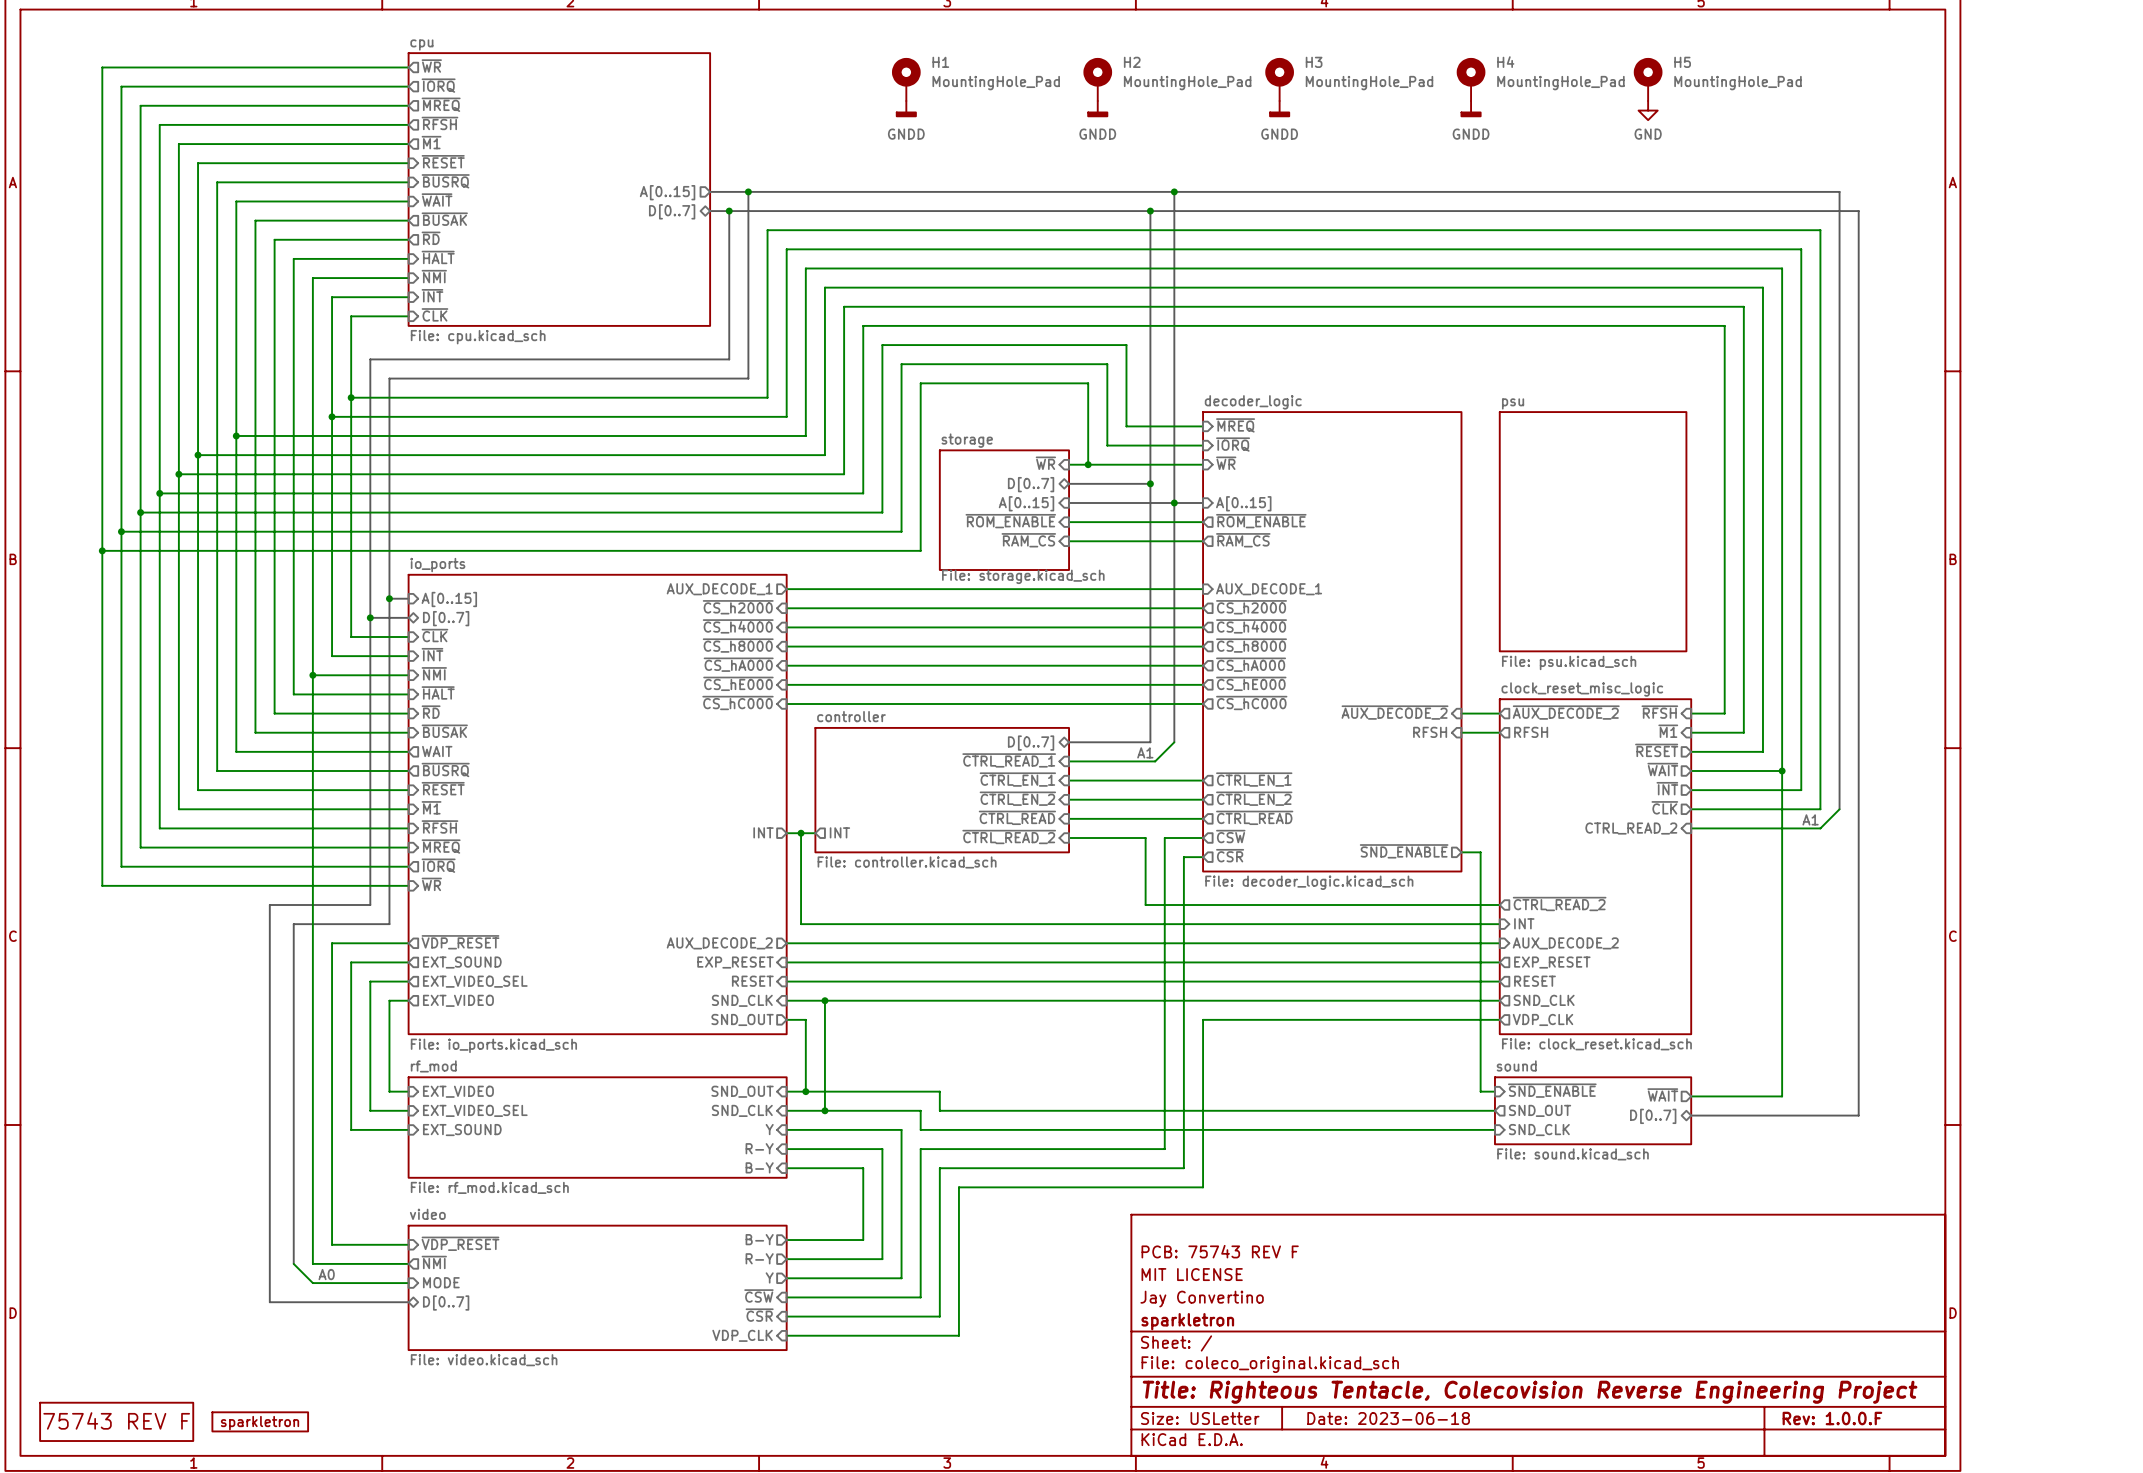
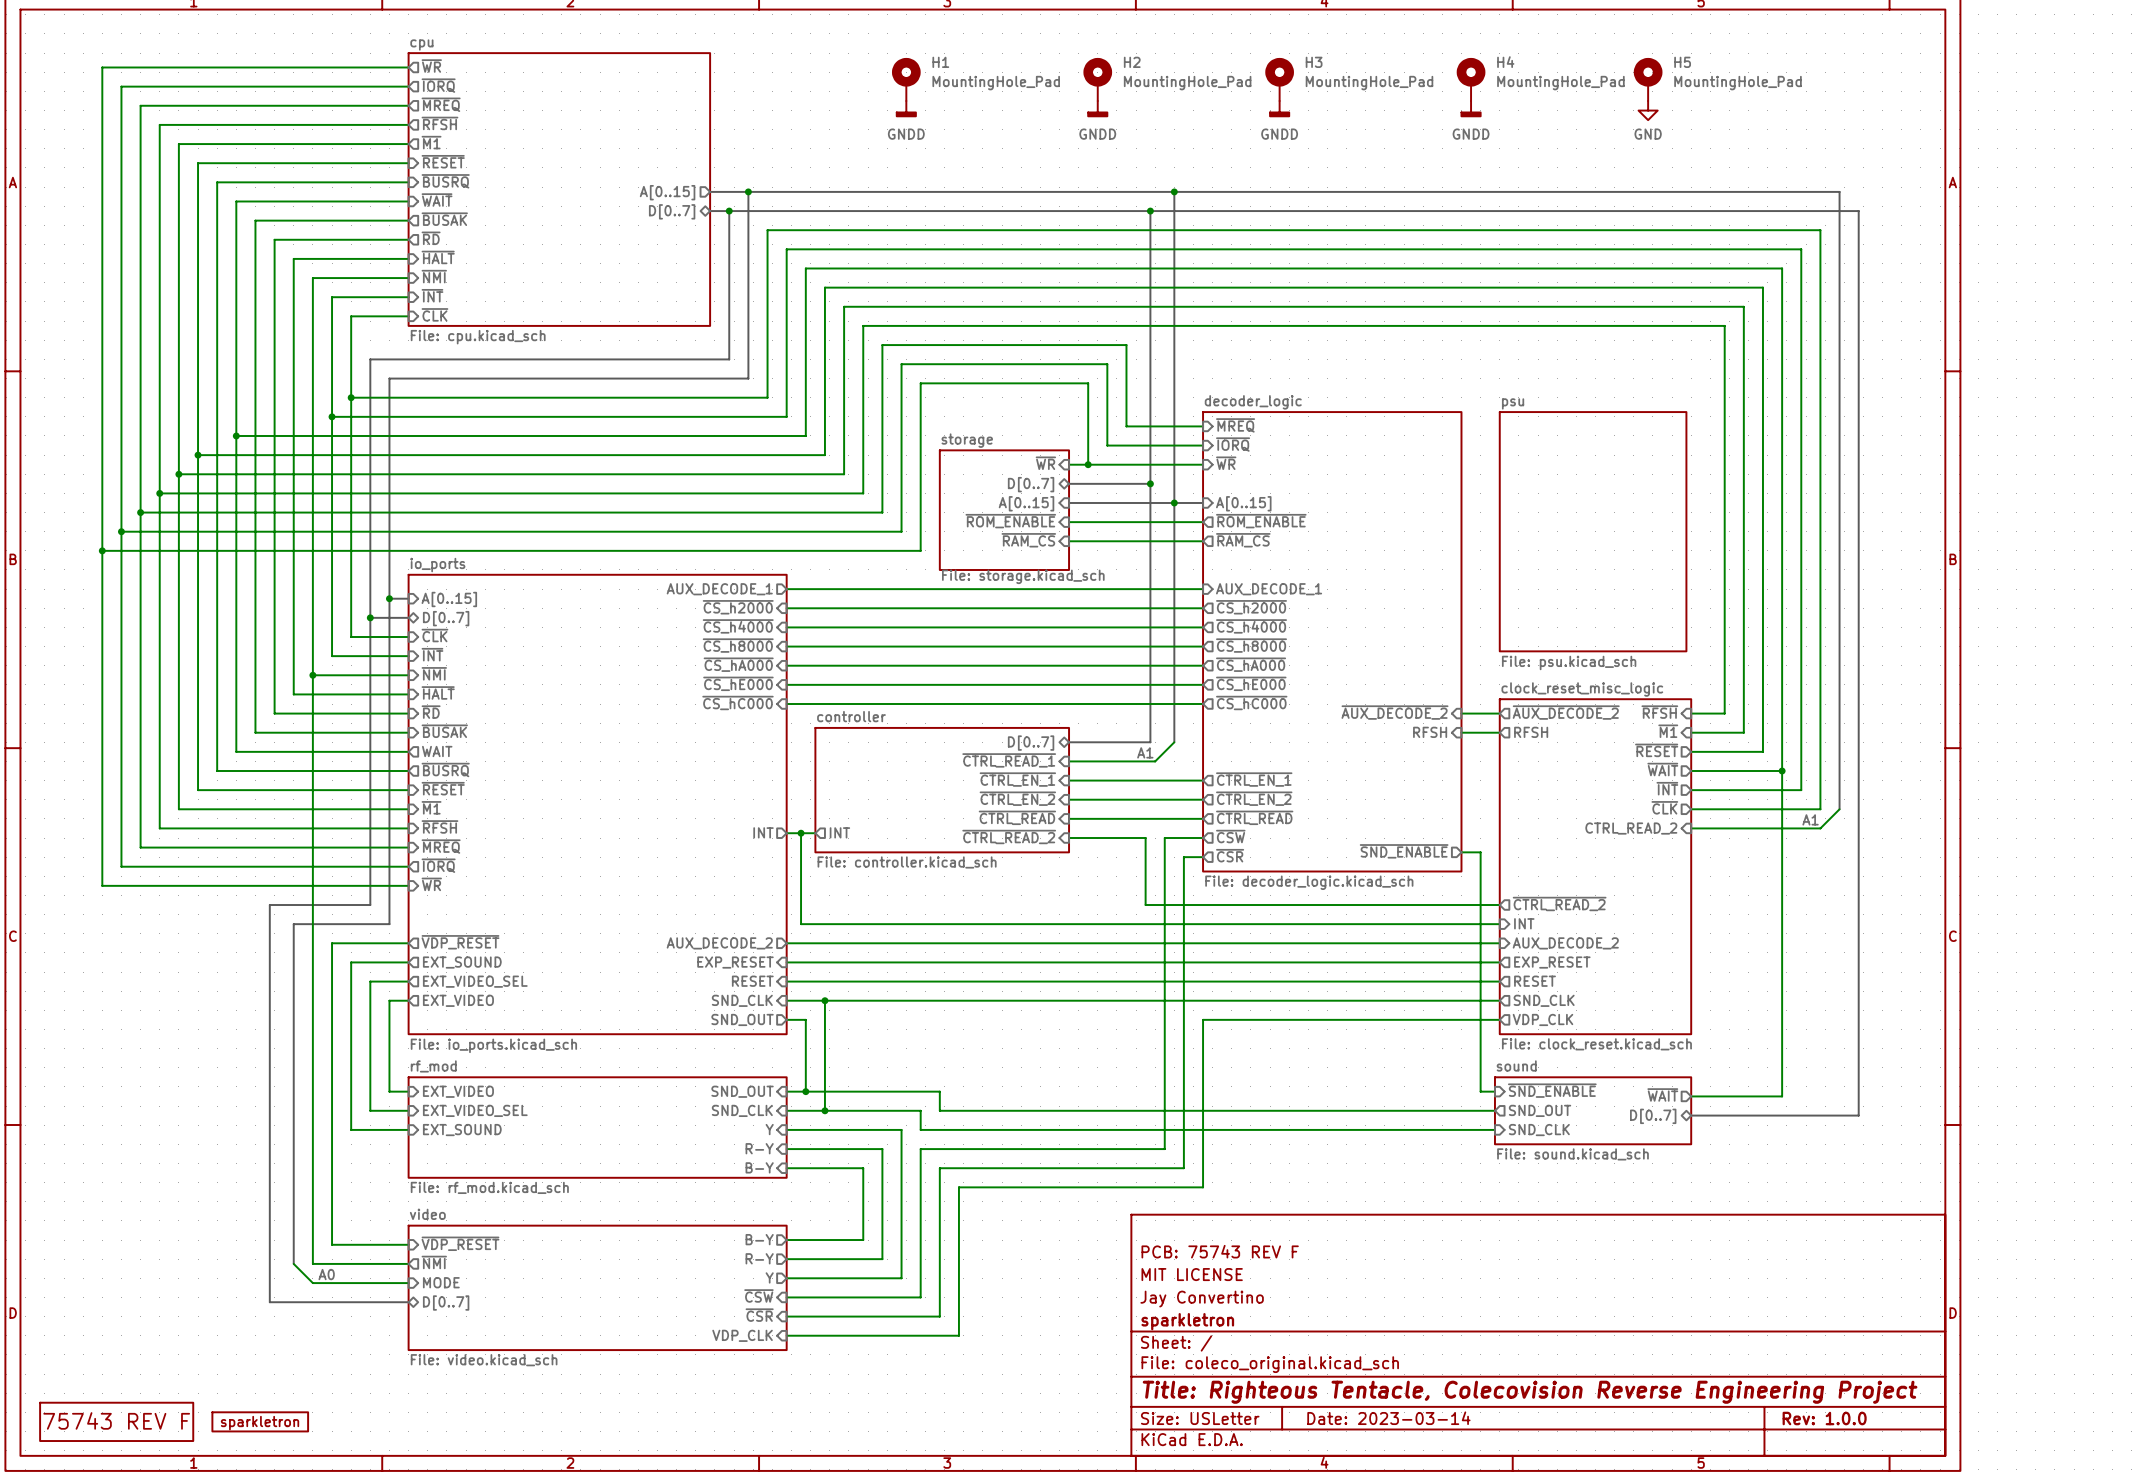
title block: Date: 2023-06-18 (1388, 1418) -> Date: 2023-03-14 (1388, 1418)
title block: Rev: 1.0.0.F (1832, 1418) -> Rev: 1.0.0 (1824, 1418)

